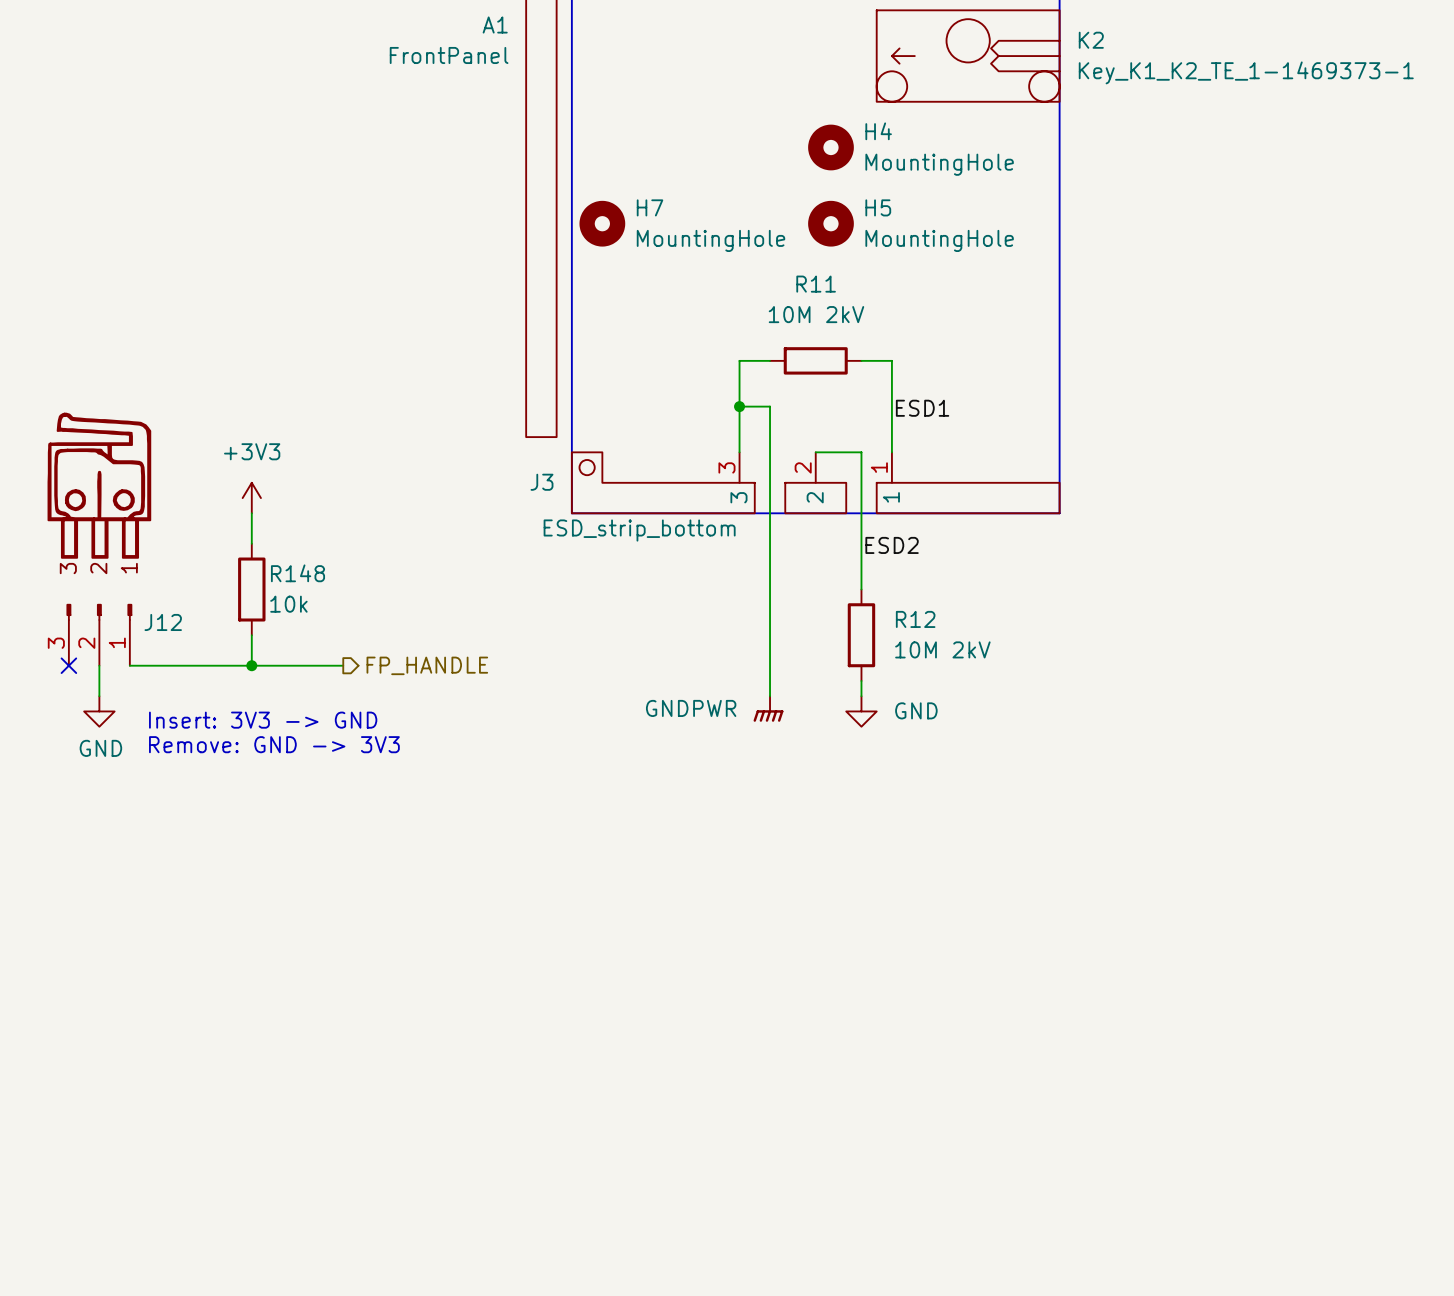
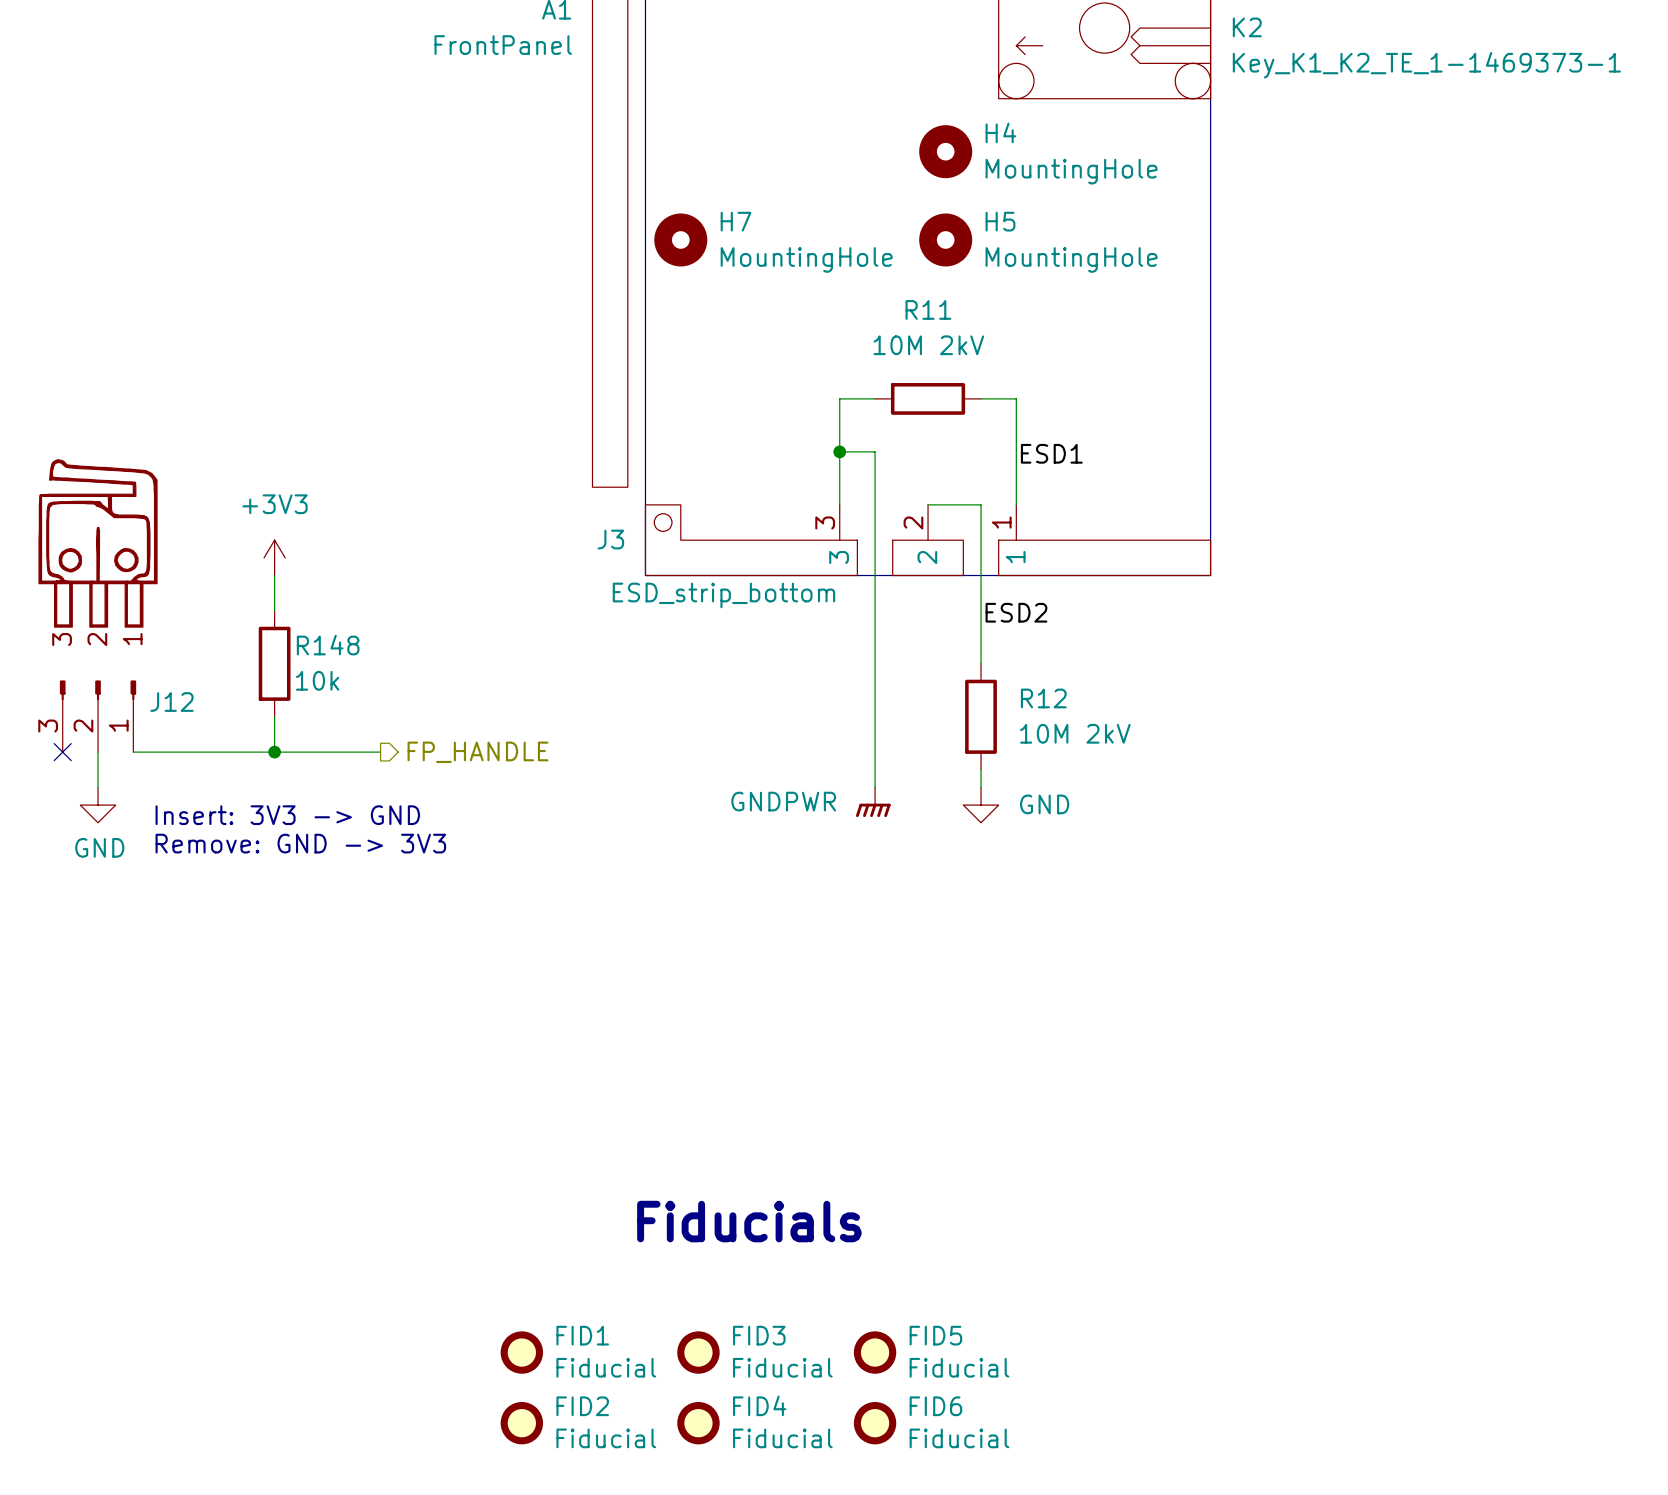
text: none -> Fiducials (749, 1221)
FID1: none -> Fiducial (521, 1352)
FID3: none -> Fiducial (698, 1352)
FID5: none -> Fiducial (875, 1352)
FID2: none -> Fiducial (521, 1423)
FID4: none -> Fiducial (698, 1423)
FID6: none -> Fiducial (875, 1423)

